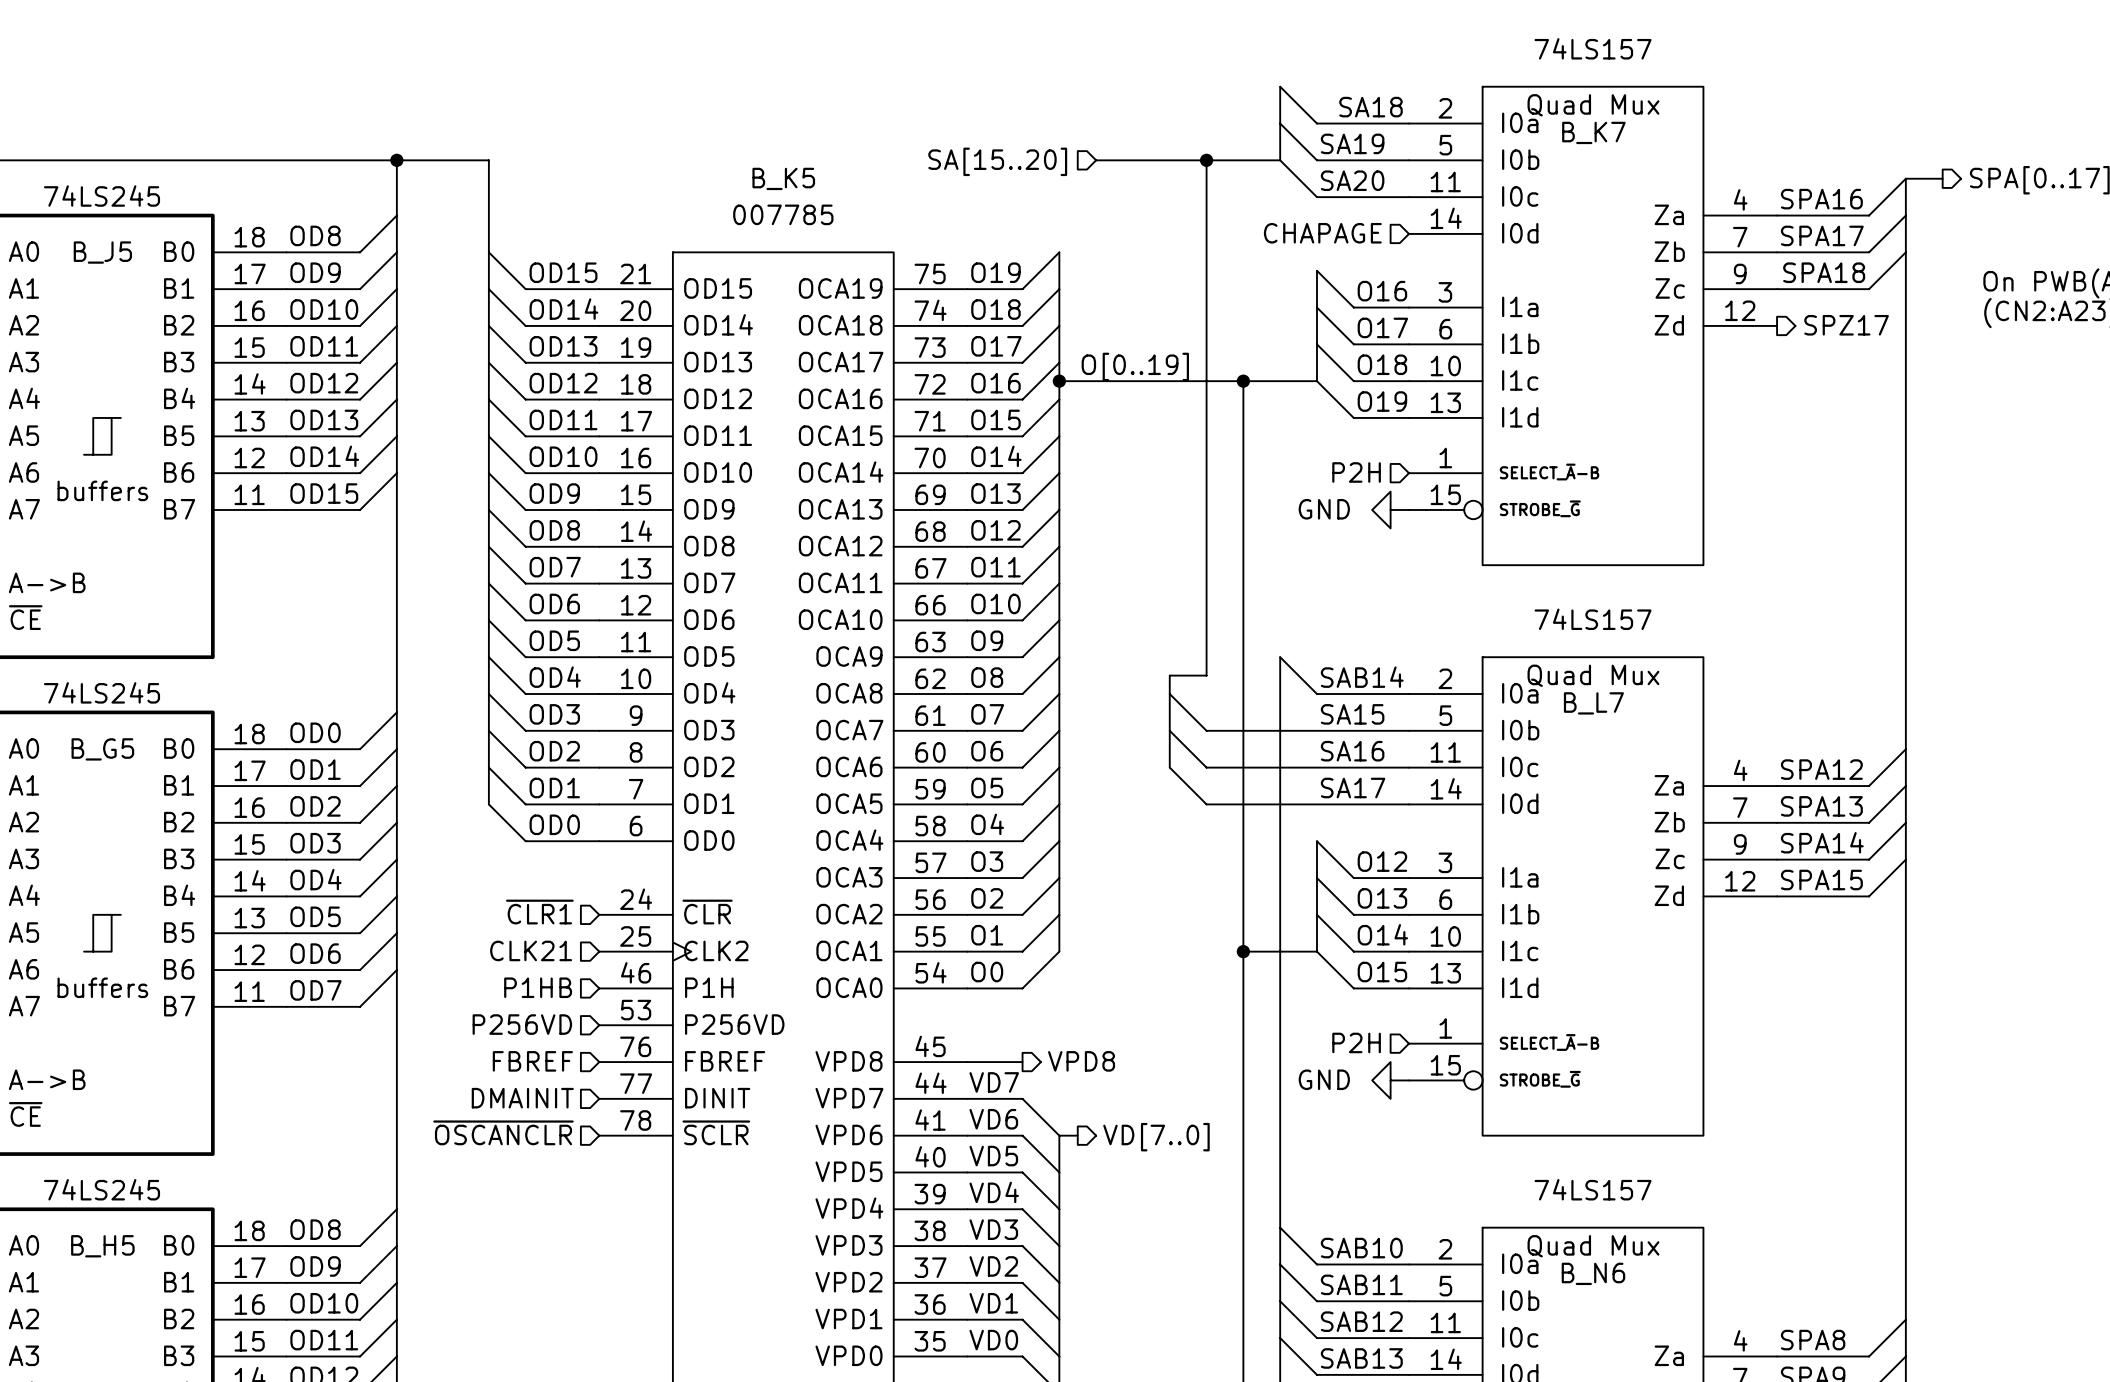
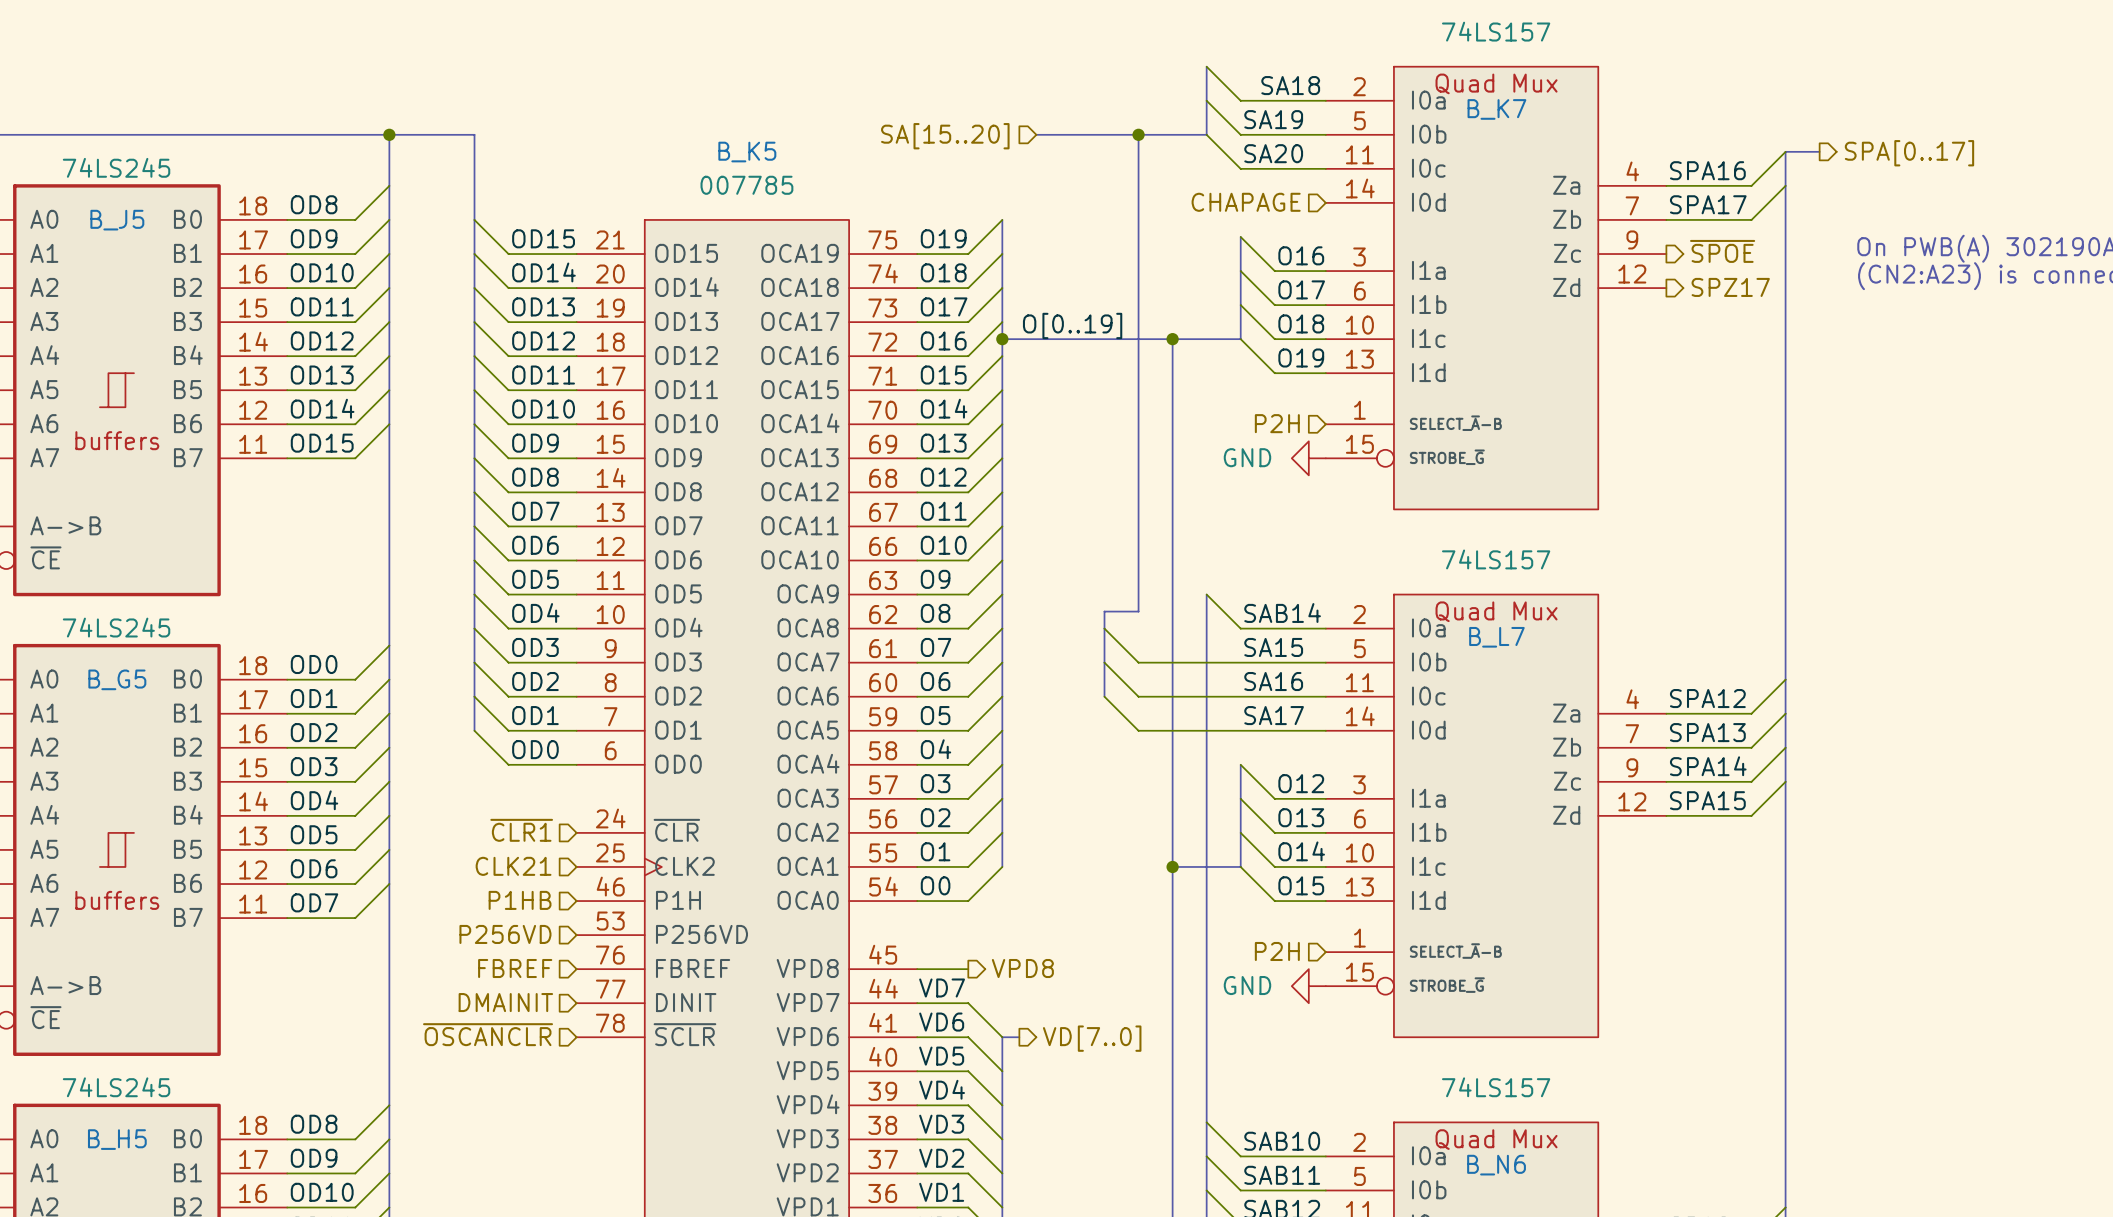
wire: (1905, 252) (1869, 289) (1777, 289) -> none
label: SPA18 (1824, 272) -> none
hierarchical label: none -> ~{SPOE} (1722, 251)

